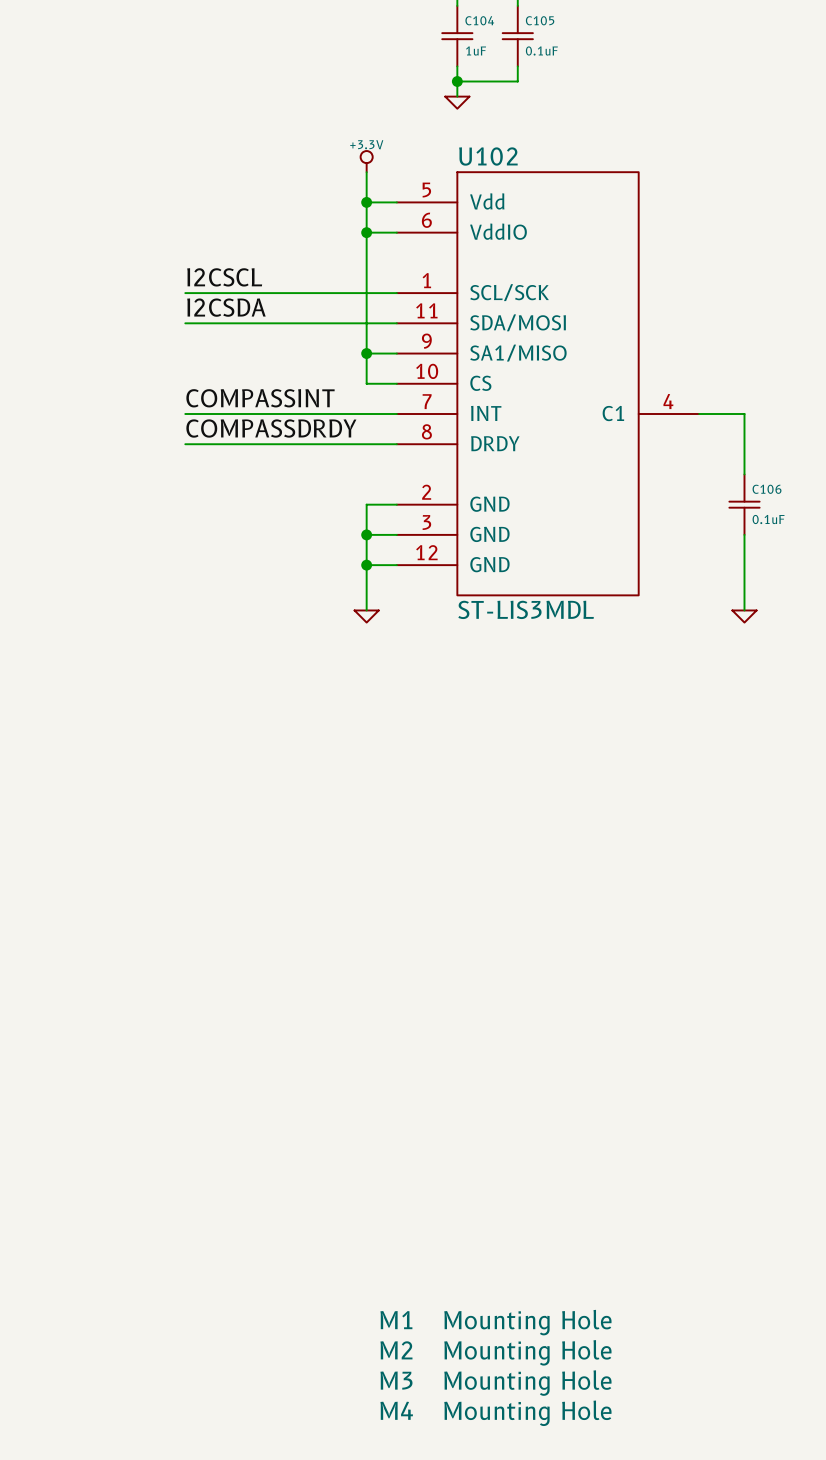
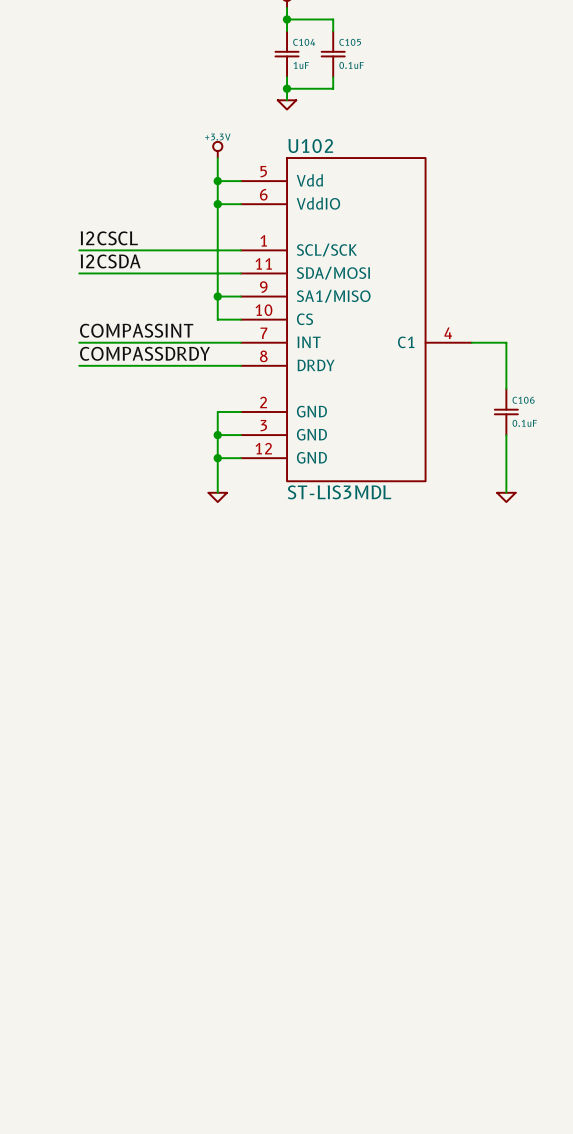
M1: Mounting Hole (495, 1322) -> none
M2: Mounting Hole (495, 1352) -> none
M3: Mounting Hole (495, 1383) -> none
M4: Mounting Hole (495, 1413) -> none

